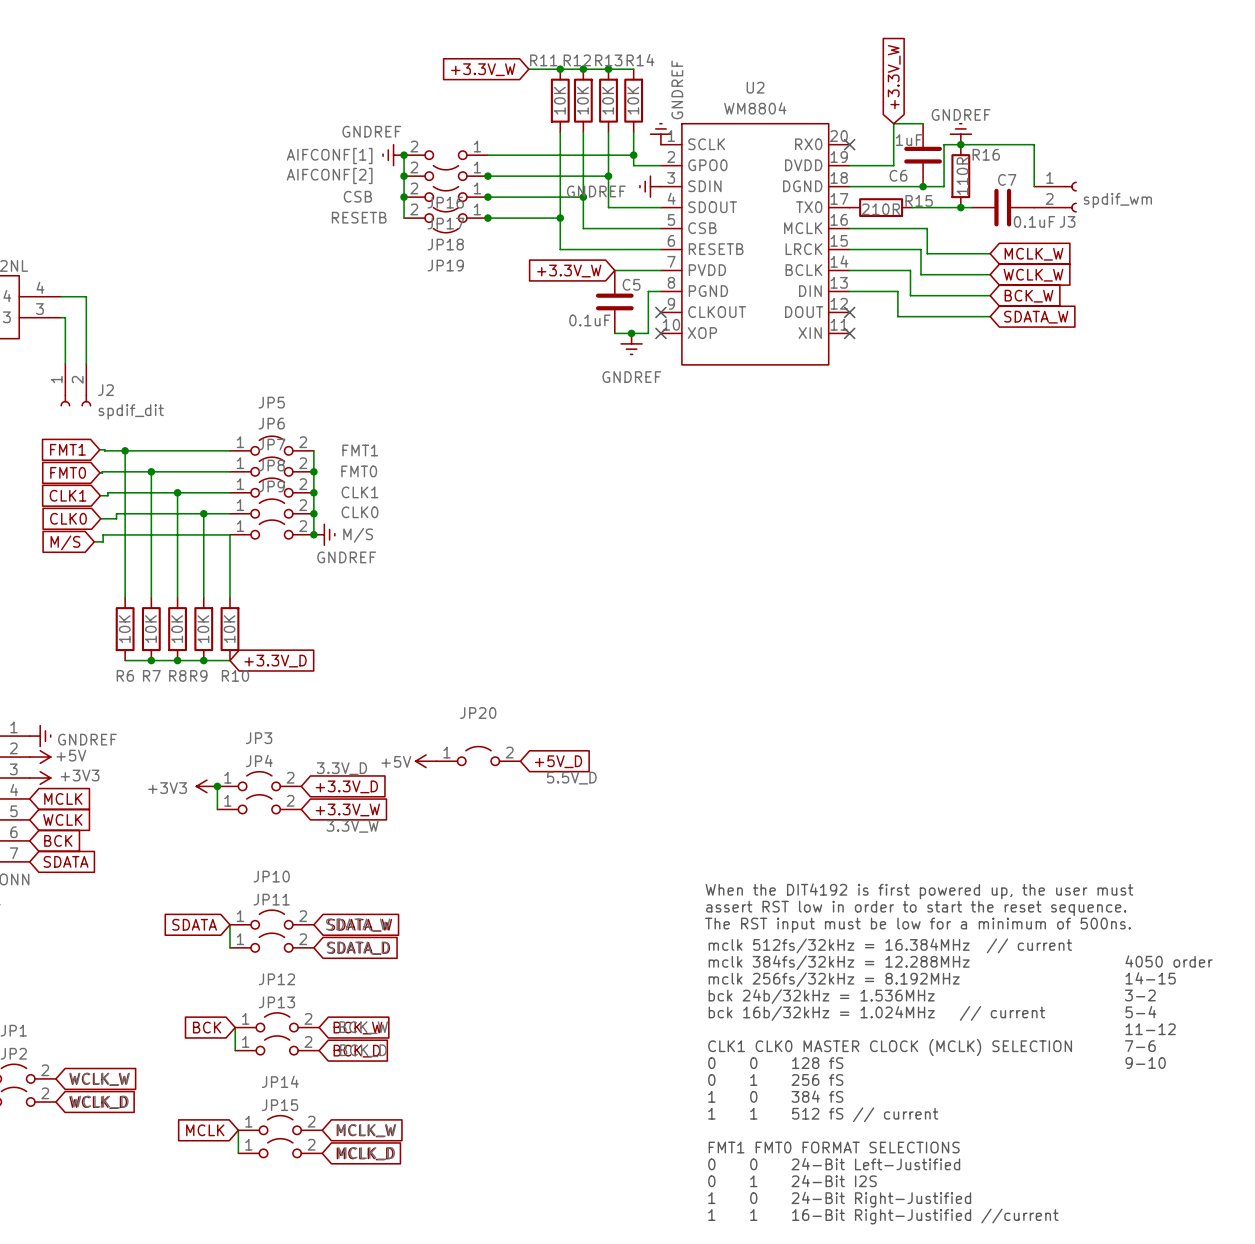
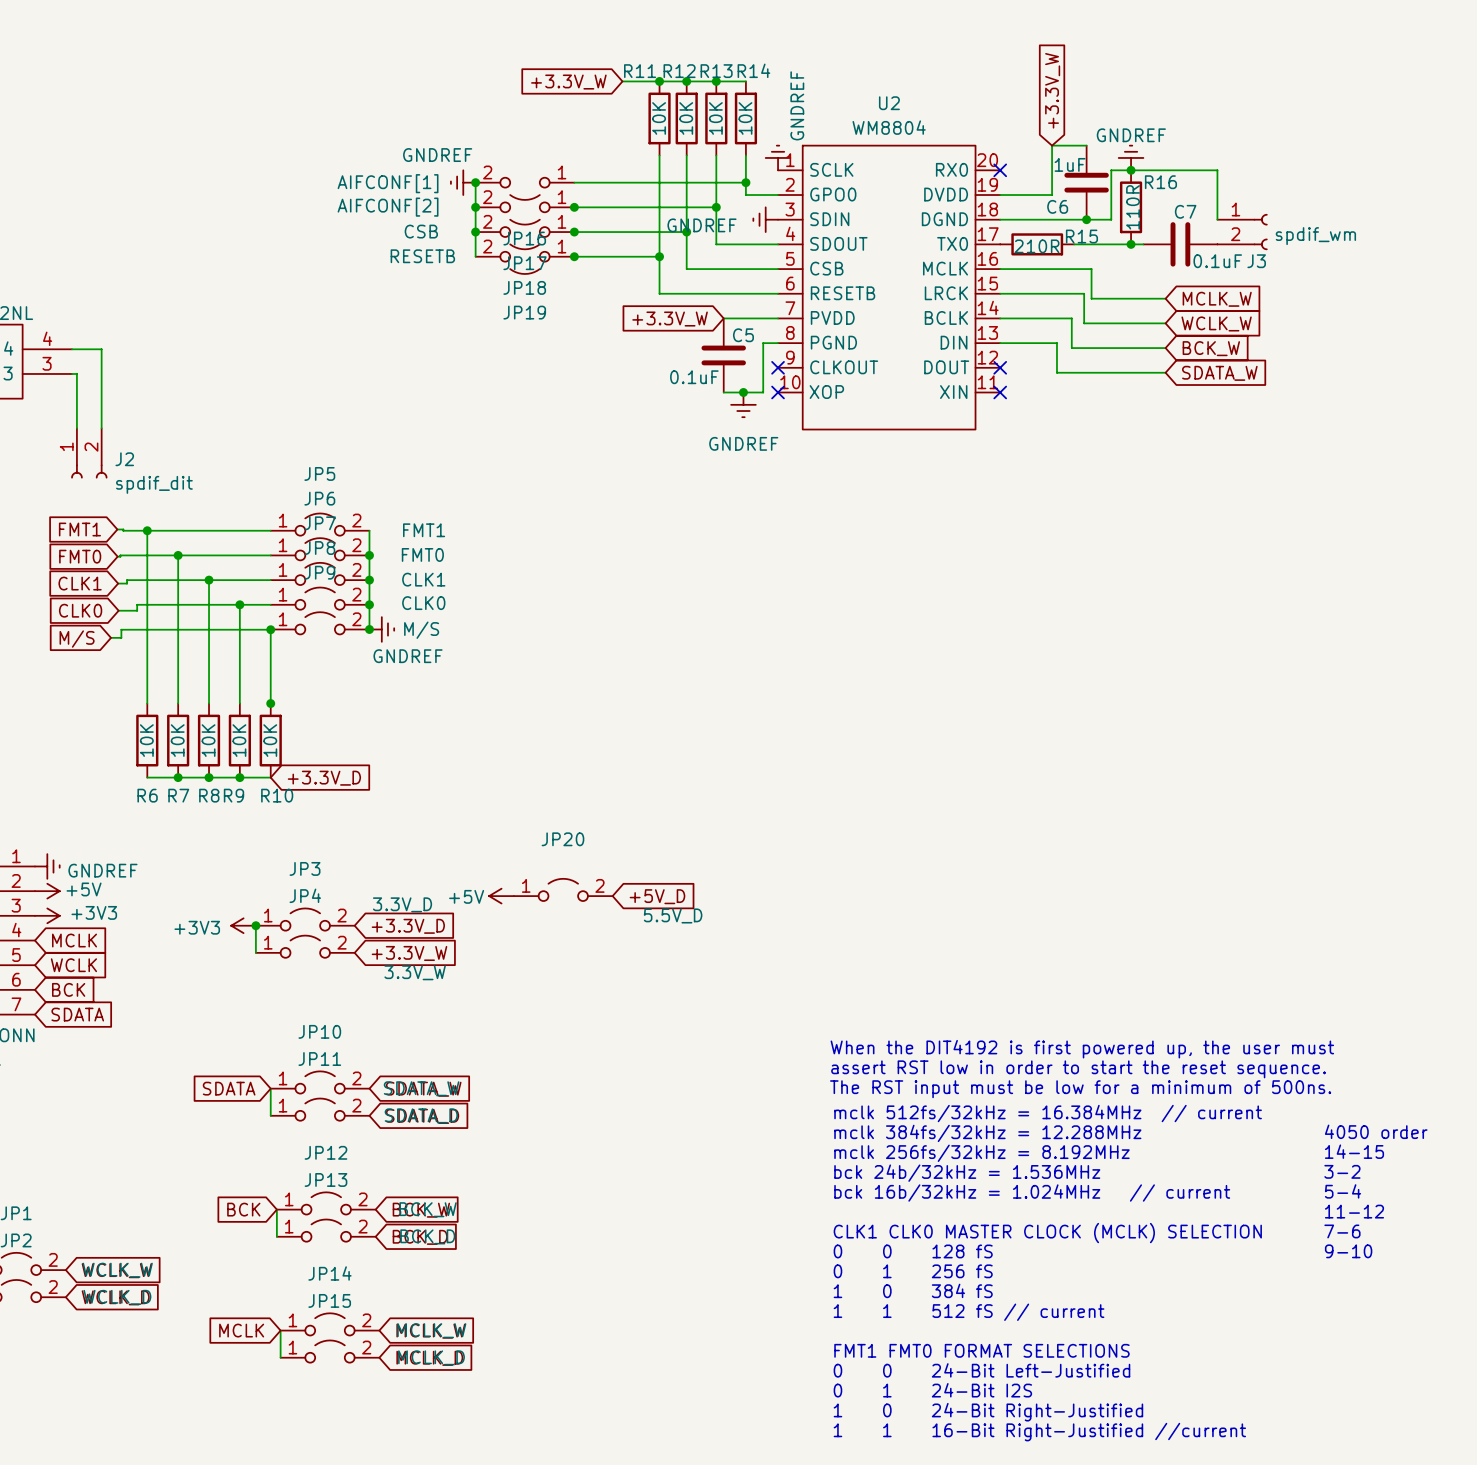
junction: none -> (270, 629)
junction: none -> (270, 703)

